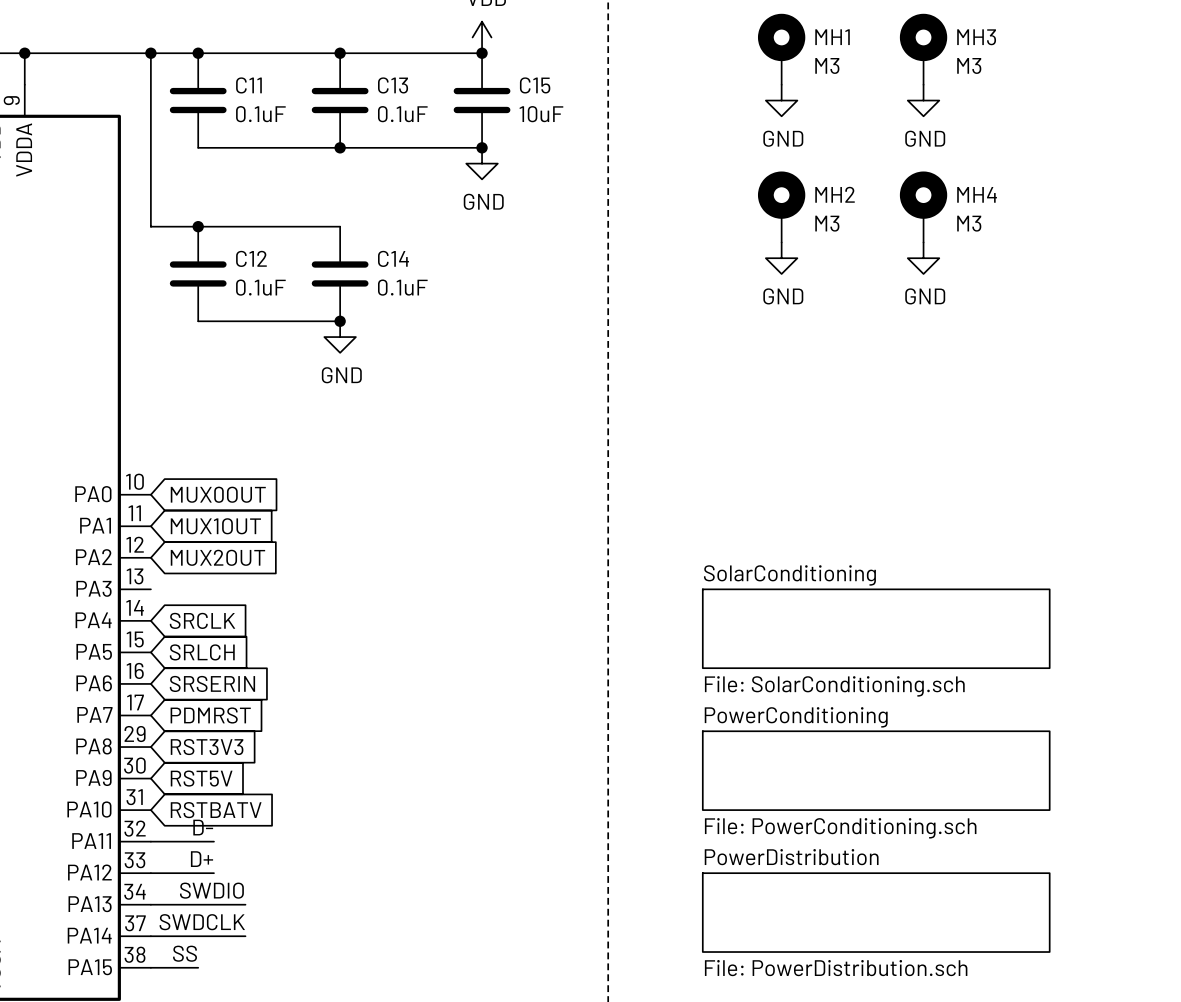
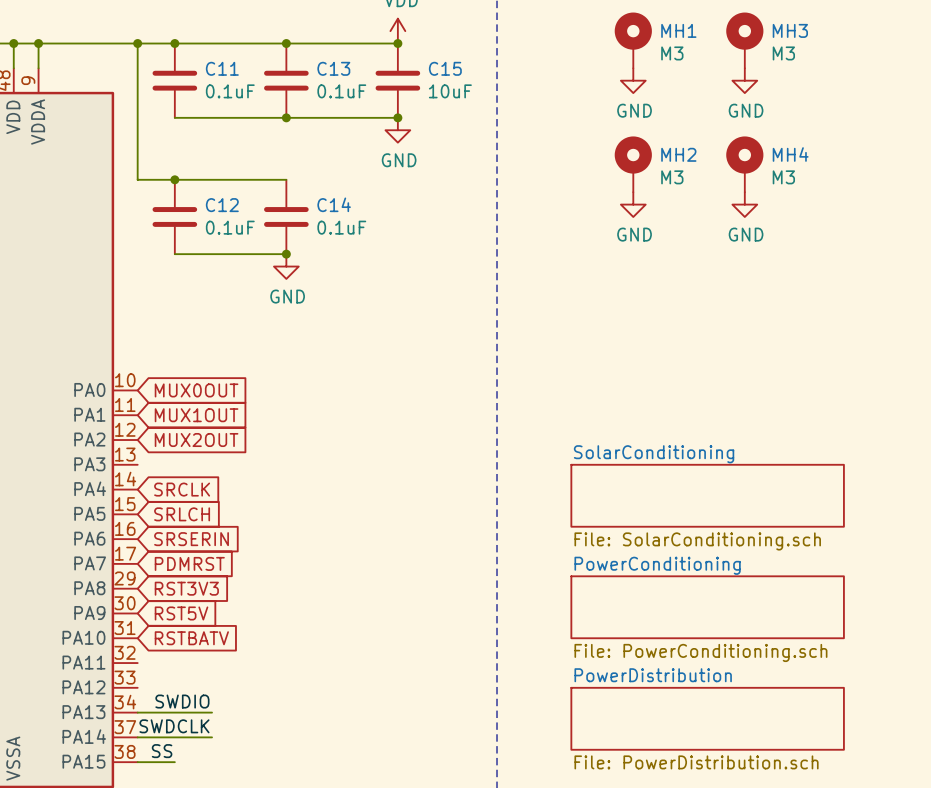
label: D- (203, 827) -> none
wire: (150, 841) (213, 841) -> none
label: D+ (202, 859) -> none
wire: (150, 873) (213, 873) -> none

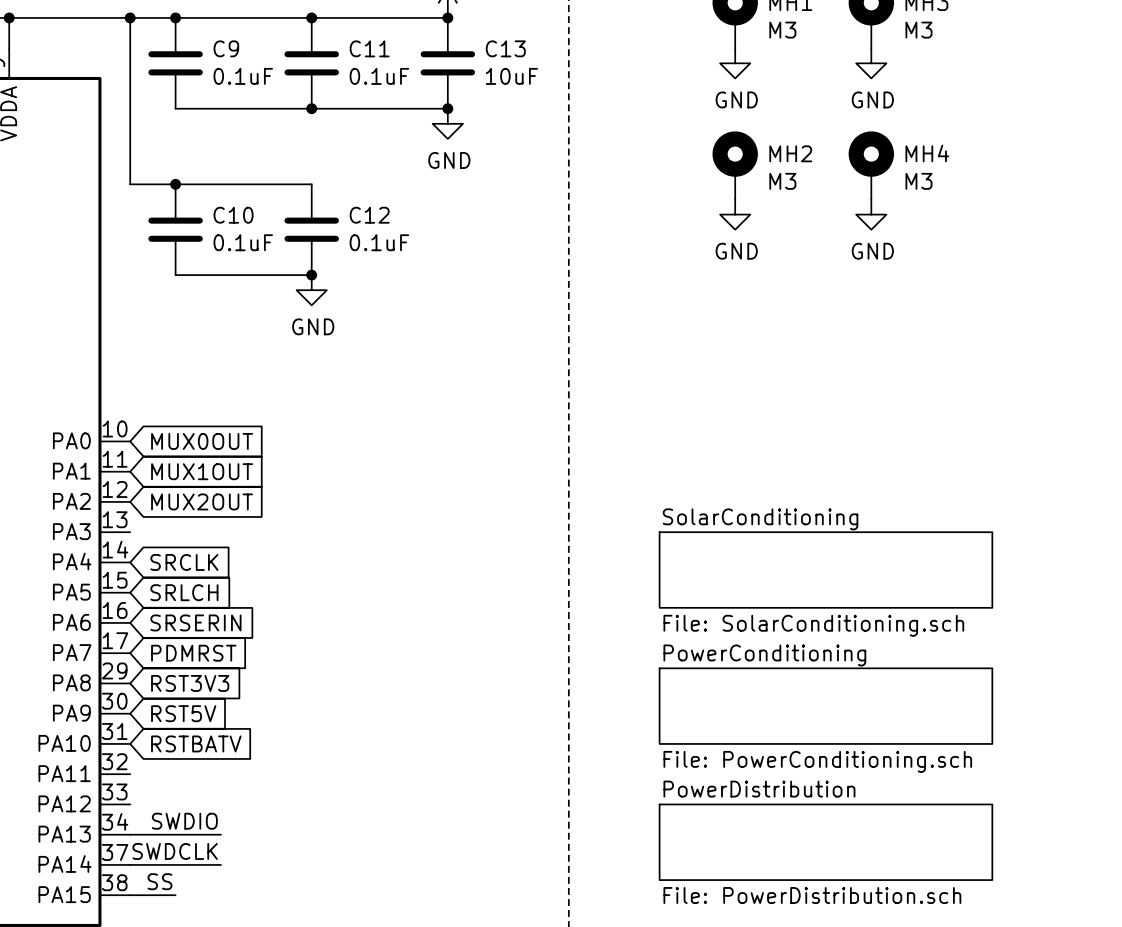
C11 name: C11 (222, 68) -> C9 (226, 48)
C13 name: C13 (333, 68) -> C11 (369, 48)
C15 name: C15 (445, 68) -> C13 (505, 48)
C14 name: C14 (334, 204) -> C12 (369, 215)
C12 name: C12 (222, 205) -> C10 (233, 215)

